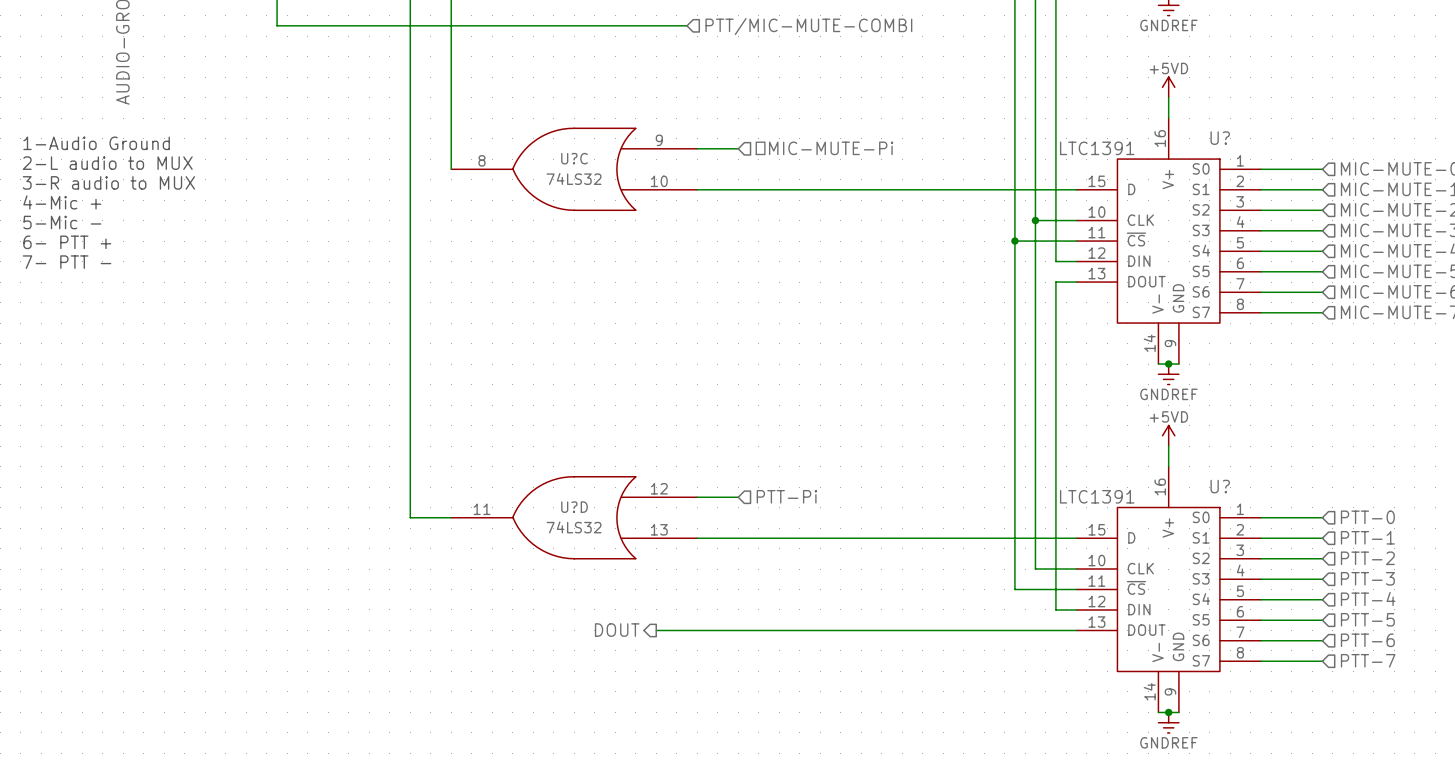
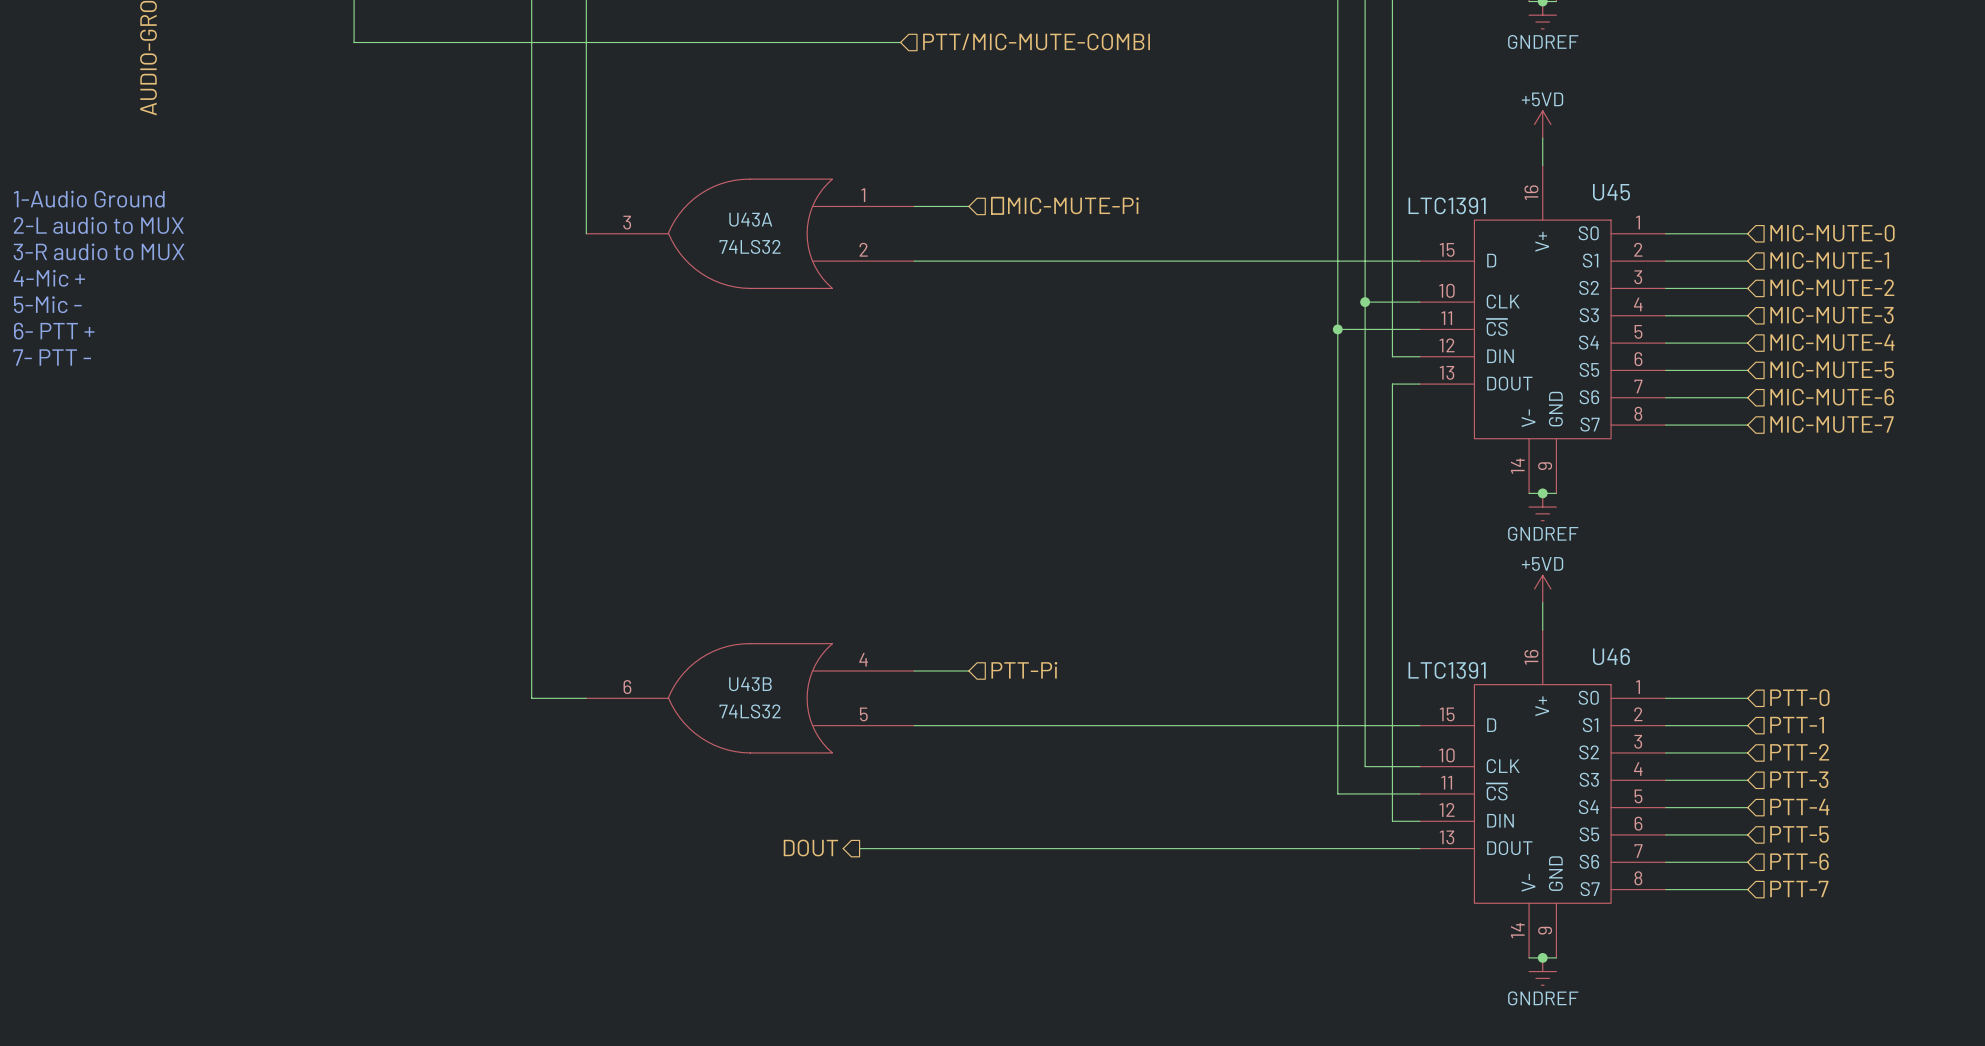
U? name: U? (1220, 138) -> U45 (1611, 192)
U?C pin number: 9 (659, 140) -> 1 (863, 195)
U?C name: U?C (574, 158) -> U43A (750, 219)
U?C pin number: 8 (482, 160) -> 3 (627, 222)
U?C pin number: 10 (659, 181) -> 2 (863, 249)
U? name: U? (1220, 486) -> U46 (1611, 656)
U?D pin number: 12 (659, 488) -> 4 (863, 659)
U?D name: U?D (574, 507) -> U43B (750, 684)
U?D pin number: 11 (482, 509) -> 6 (627, 687)
U?D pin number: 13 (659, 529) -> 5 (863, 714)

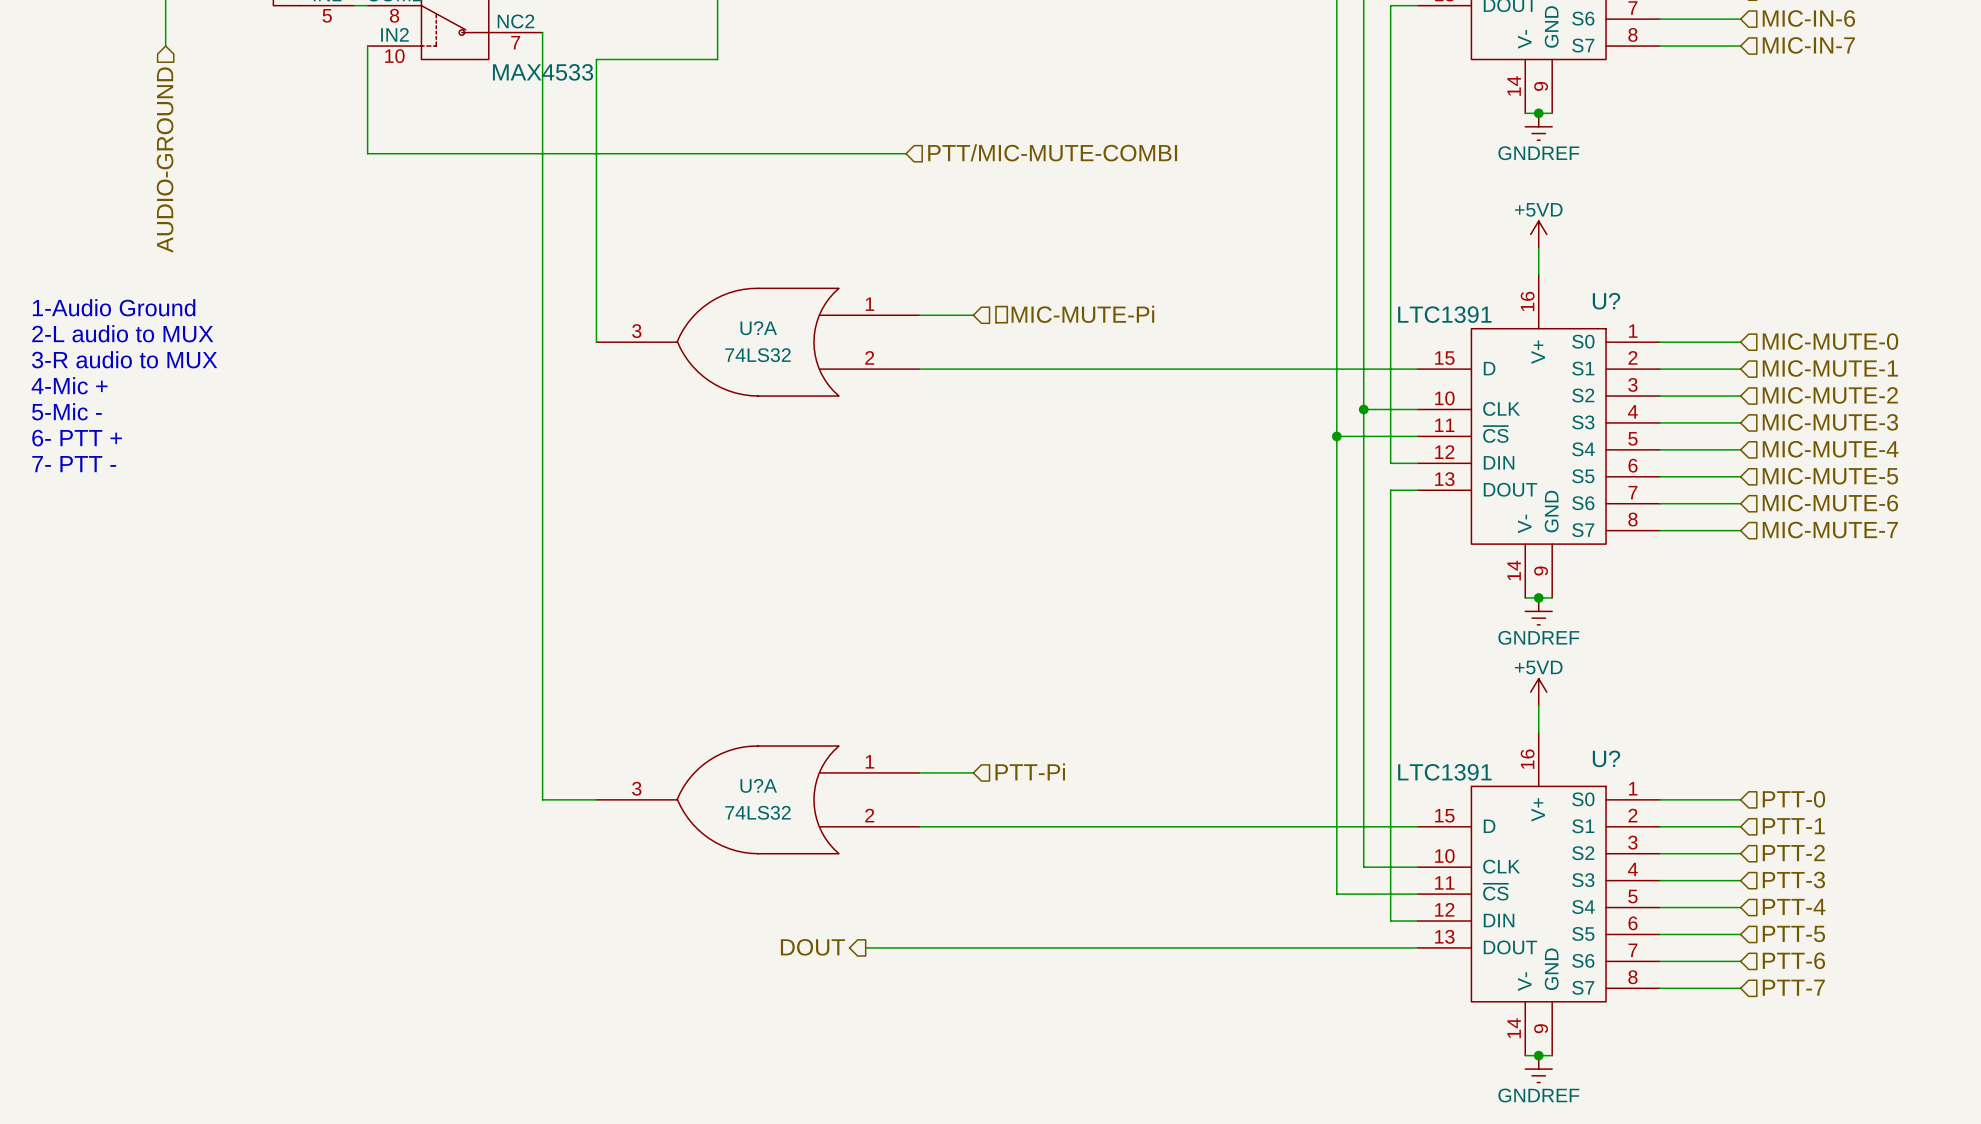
U45 name: U45 (1611, 192) -> U? (1606, 301)
U43A name: U43A (750, 219) -> U?A (758, 328)
U46 name: U46 (1611, 656) -> U? (1606, 758)
U43B pin number: 4 (863, 659) -> 1 (869, 761)
U43B name: U43B (750, 684) -> U?A (758, 785)
U43B pin number: 6 (627, 687) -> 3 (636, 788)
U43B pin number: 5 (863, 714) -> 2 (869, 815)

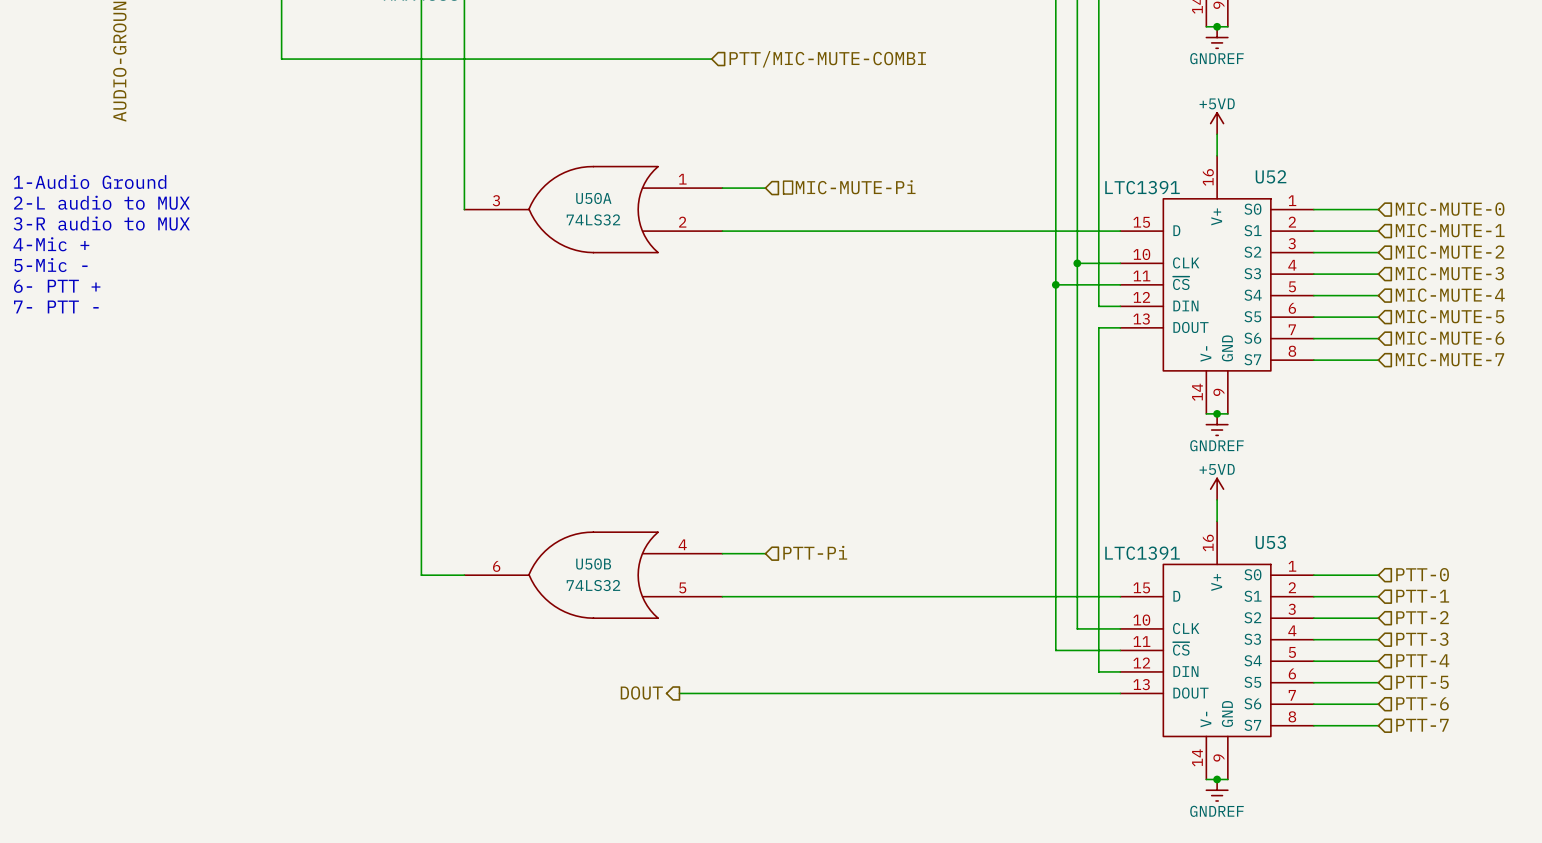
U? name: U? (1606, 301) -> U52 (1271, 176)
U?A name: U?A (758, 328) -> U50A (593, 198)
U? name: U? (1606, 758) -> U53 (1270, 542)
U?A pin number: 1 (869, 761) -> 4 (682, 544)
U?A name: U?A (758, 785) -> U50B (593, 564)
U?A pin number: 3 (636, 788) -> 6 (496, 566)
U?A pin number: 2 (869, 815) -> 5 (682, 587)

